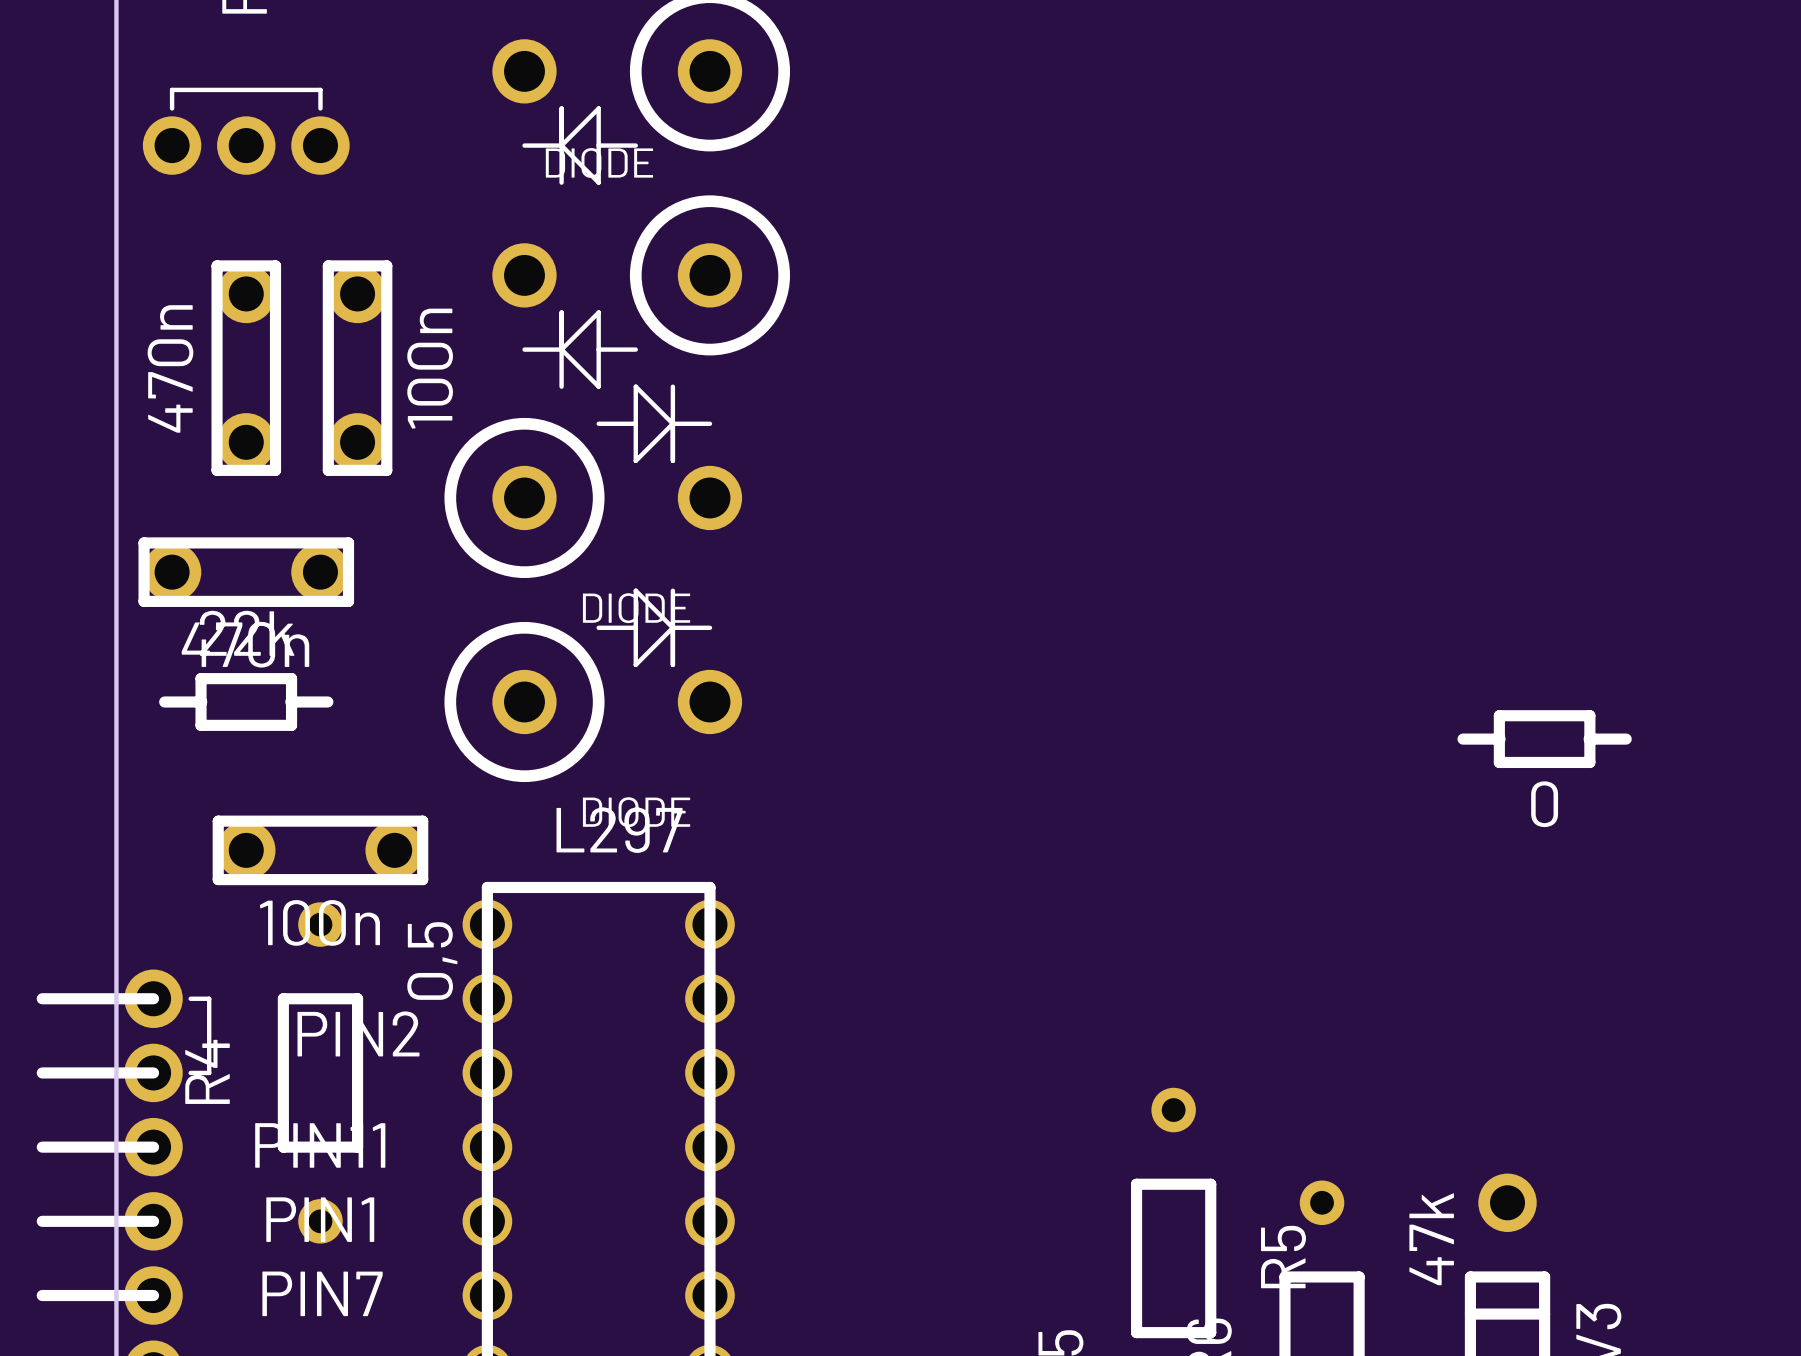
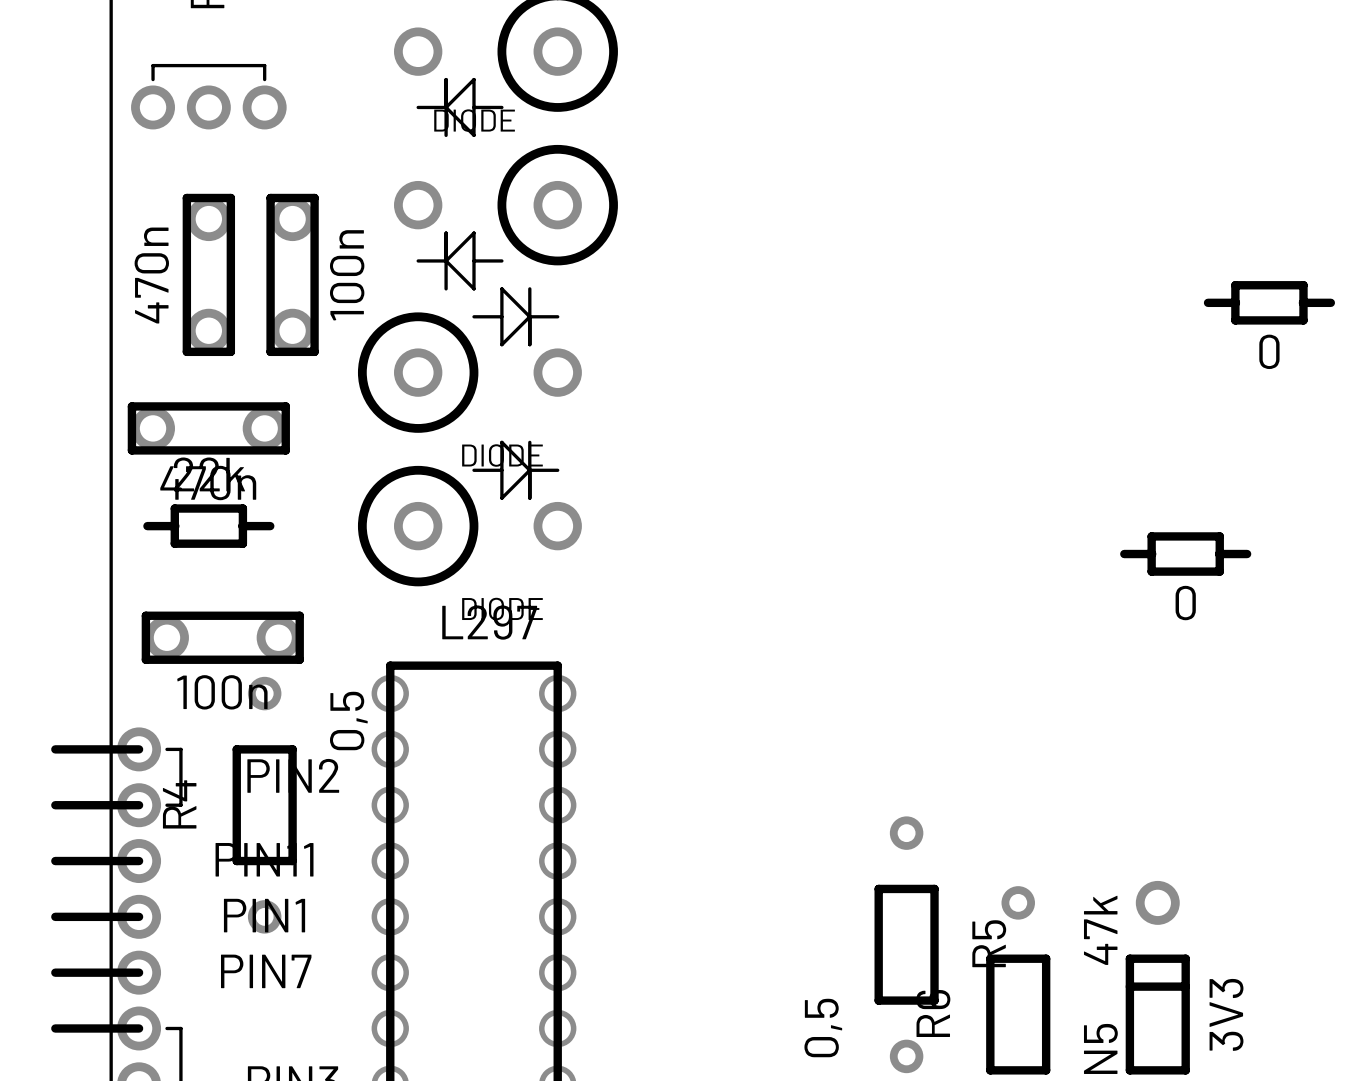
part: none -> 0 (1269, 302)
part position: (320, 850) -> (222, 637)

